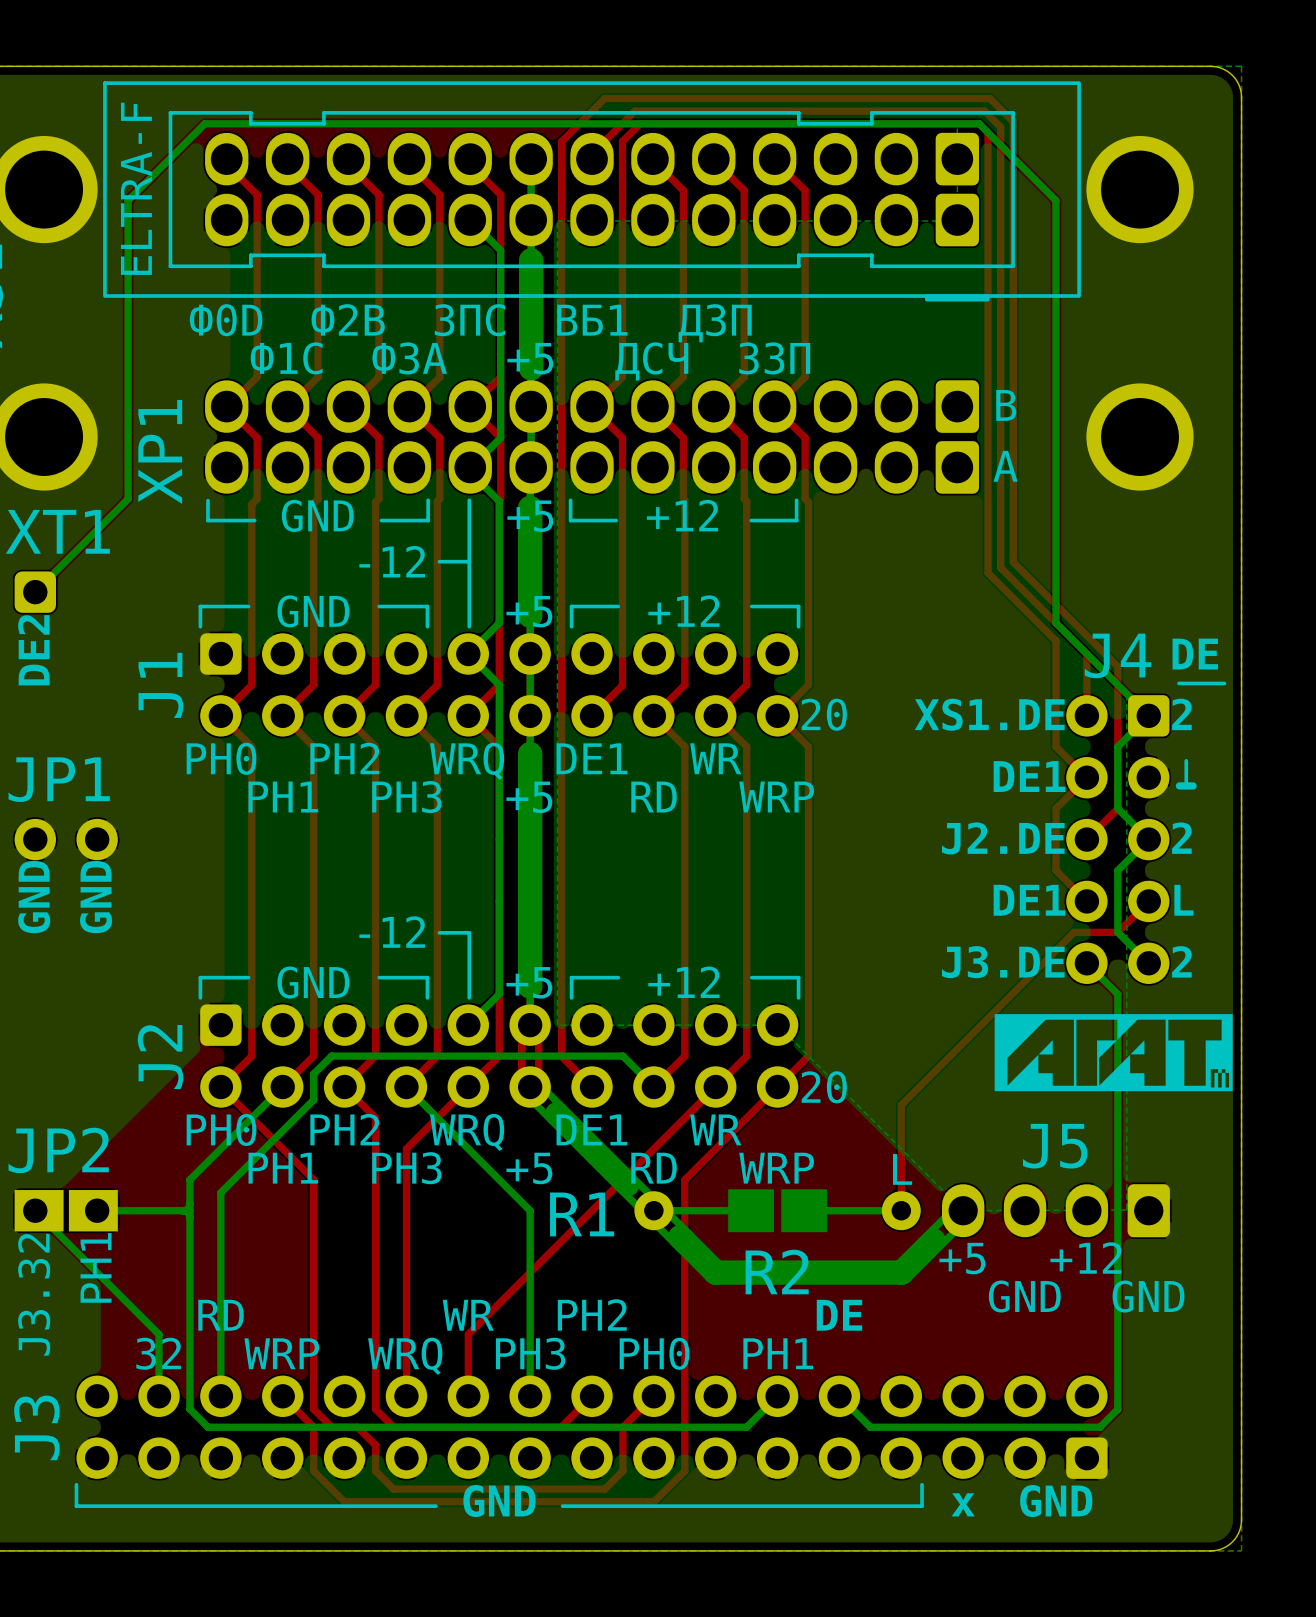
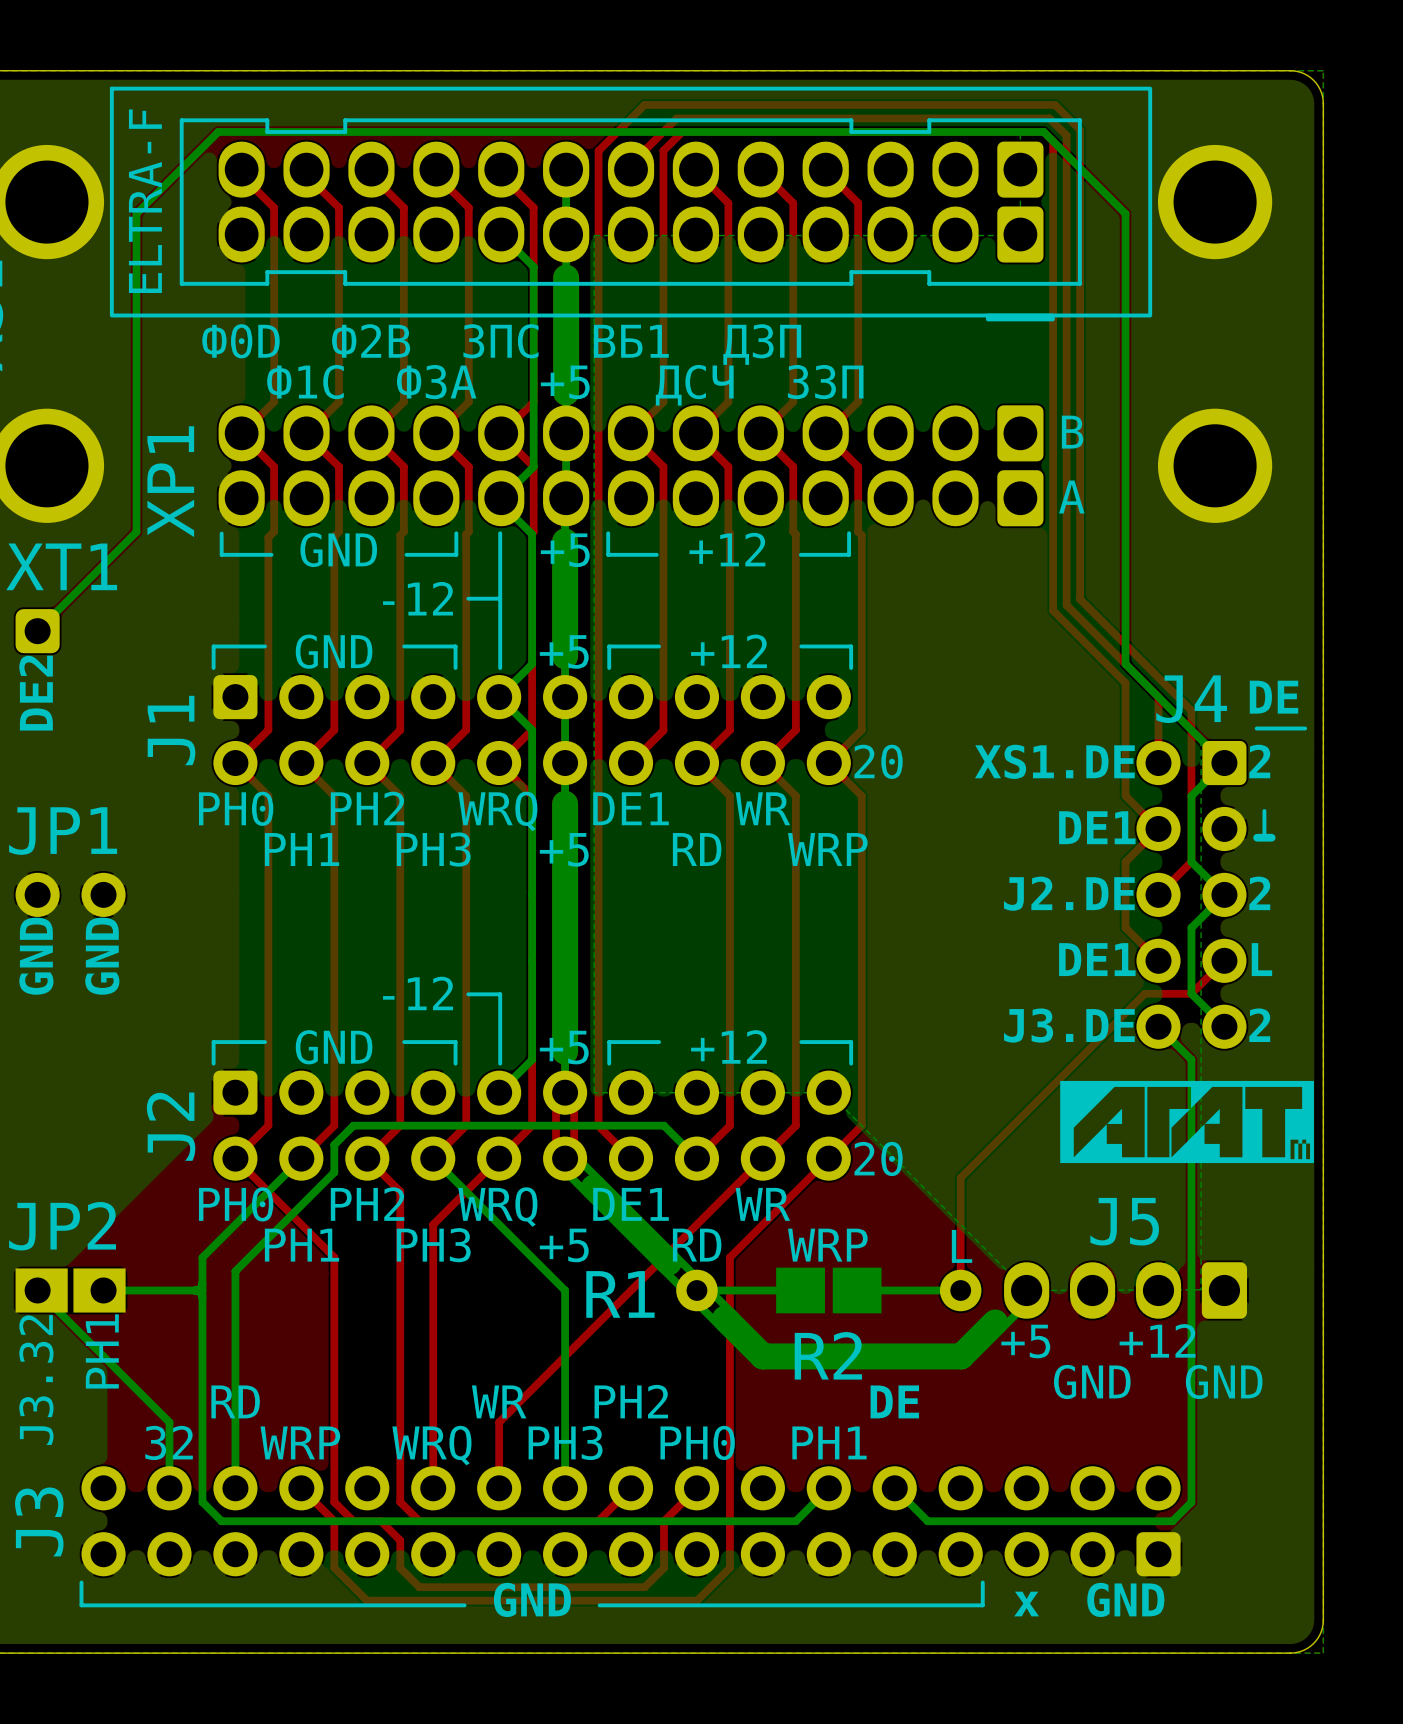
bottom track: (954, 1207) (927, 1234) -> none

